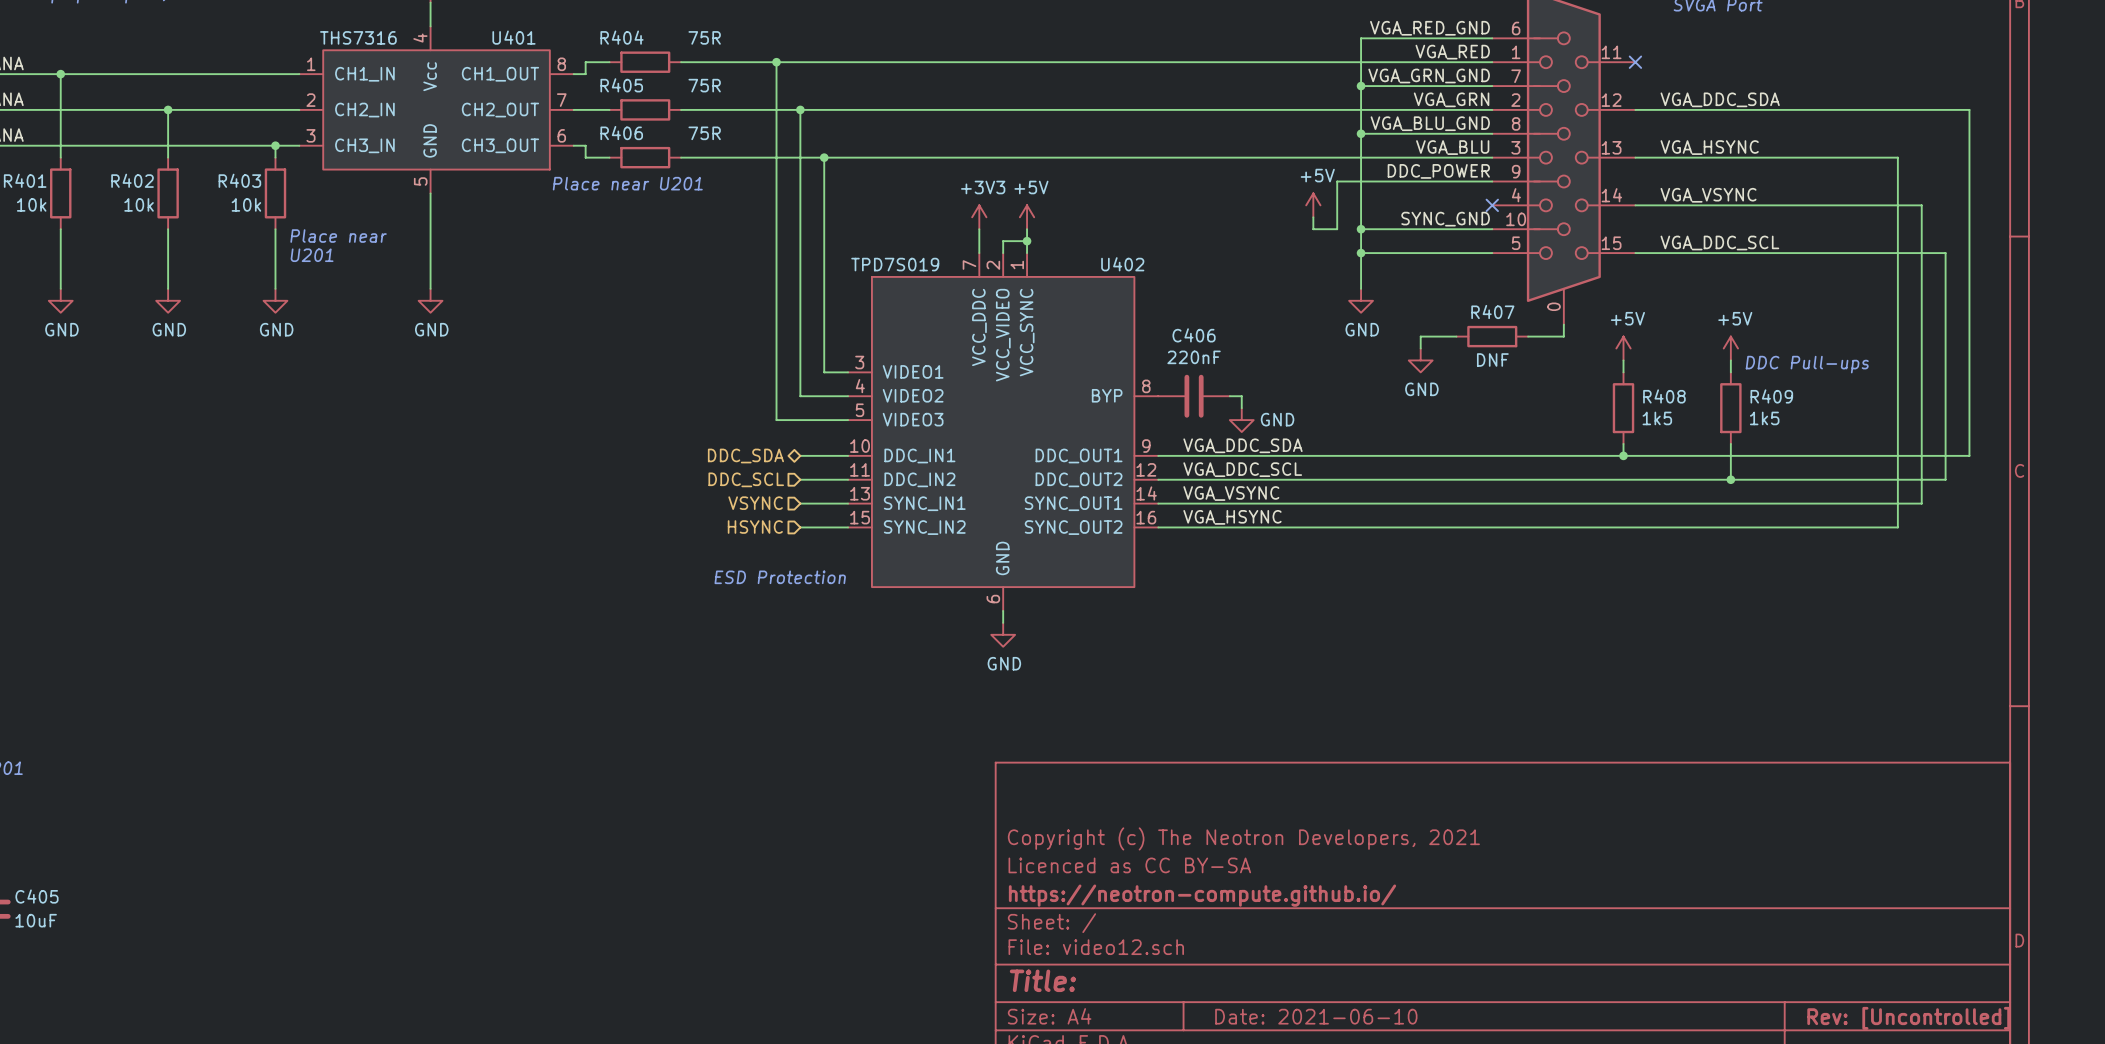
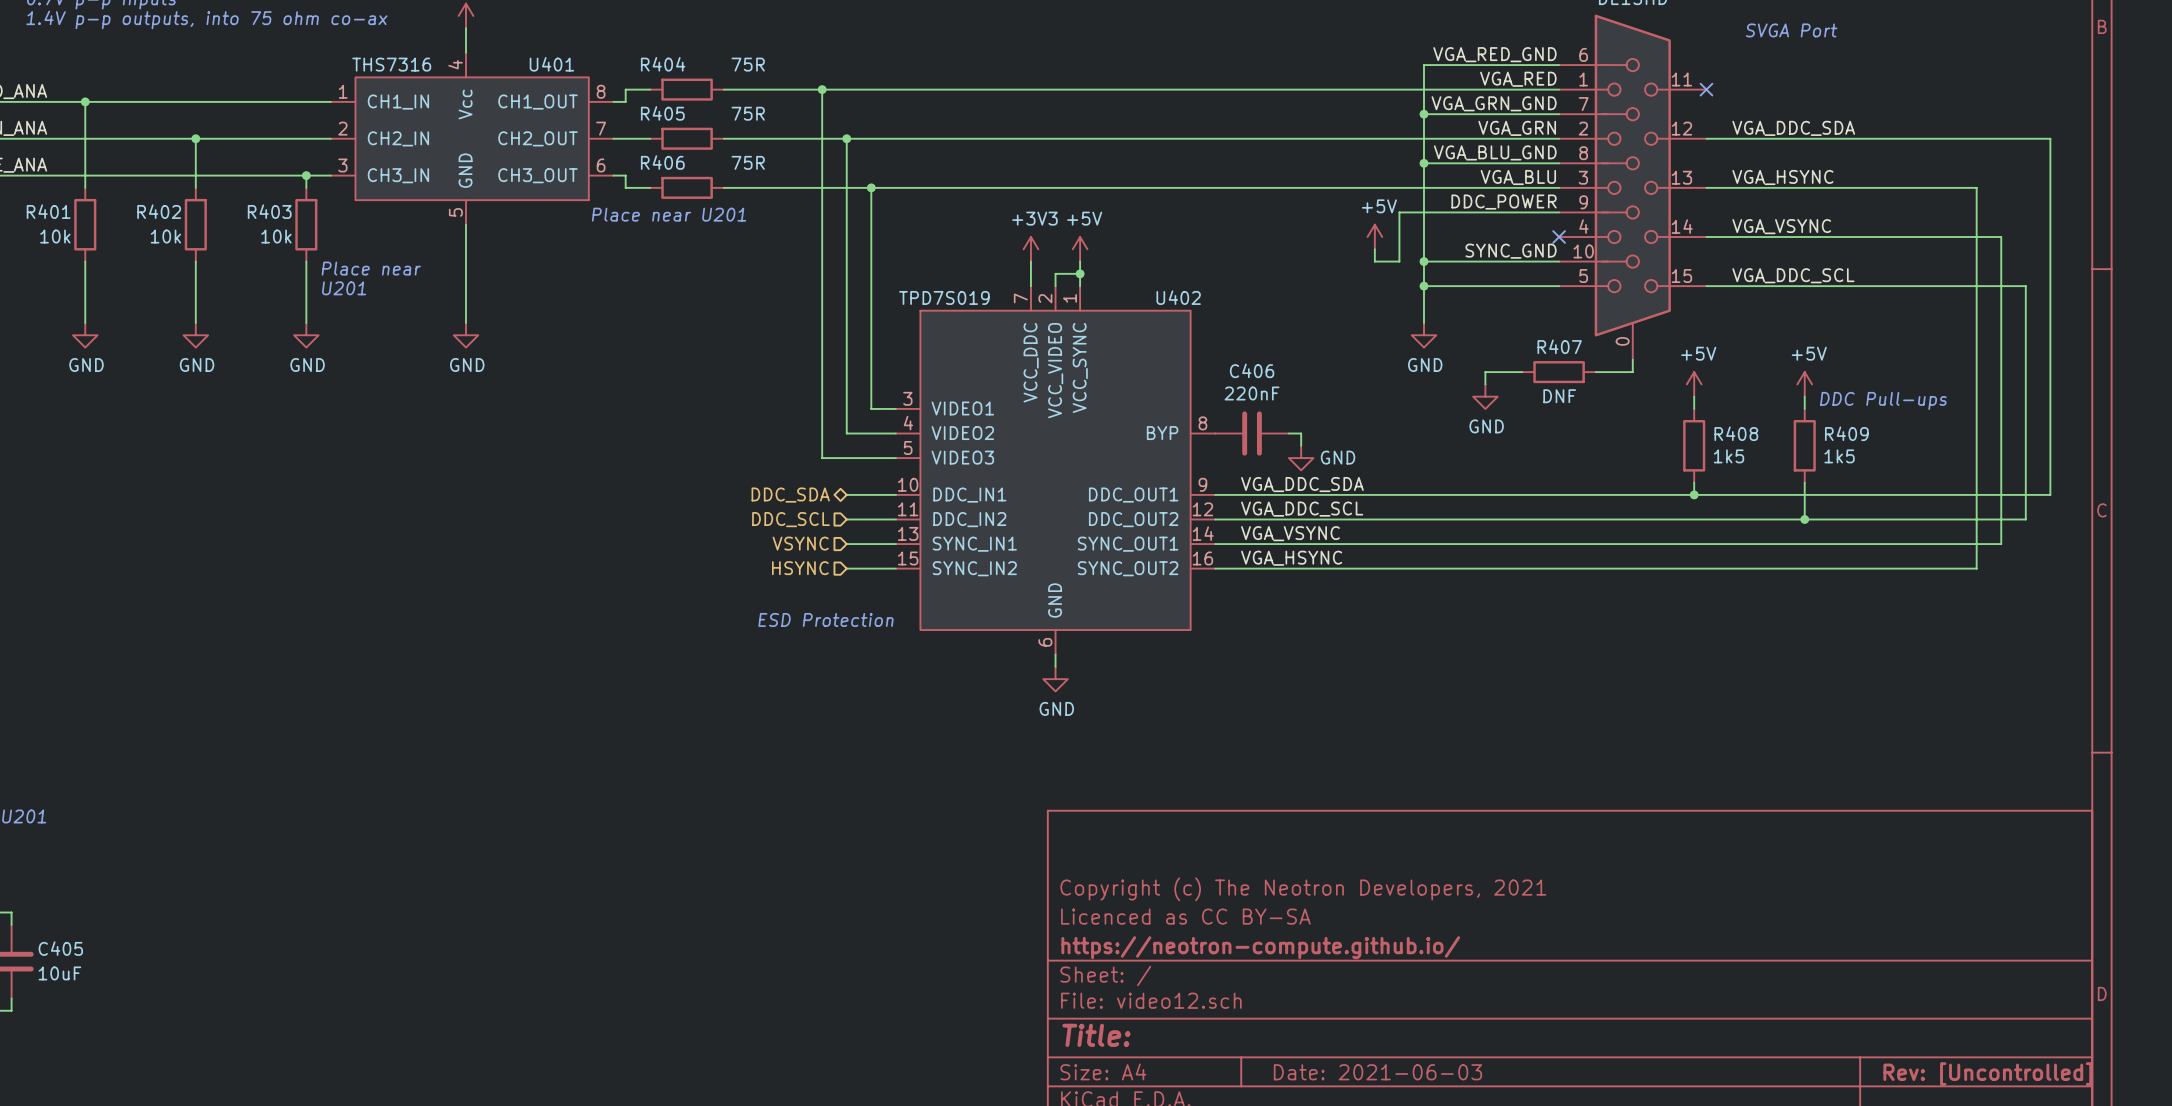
title block: Date: 2021-06-10 (1316, 1016) -> Date: 2021-06-03 (1377, 1072)

